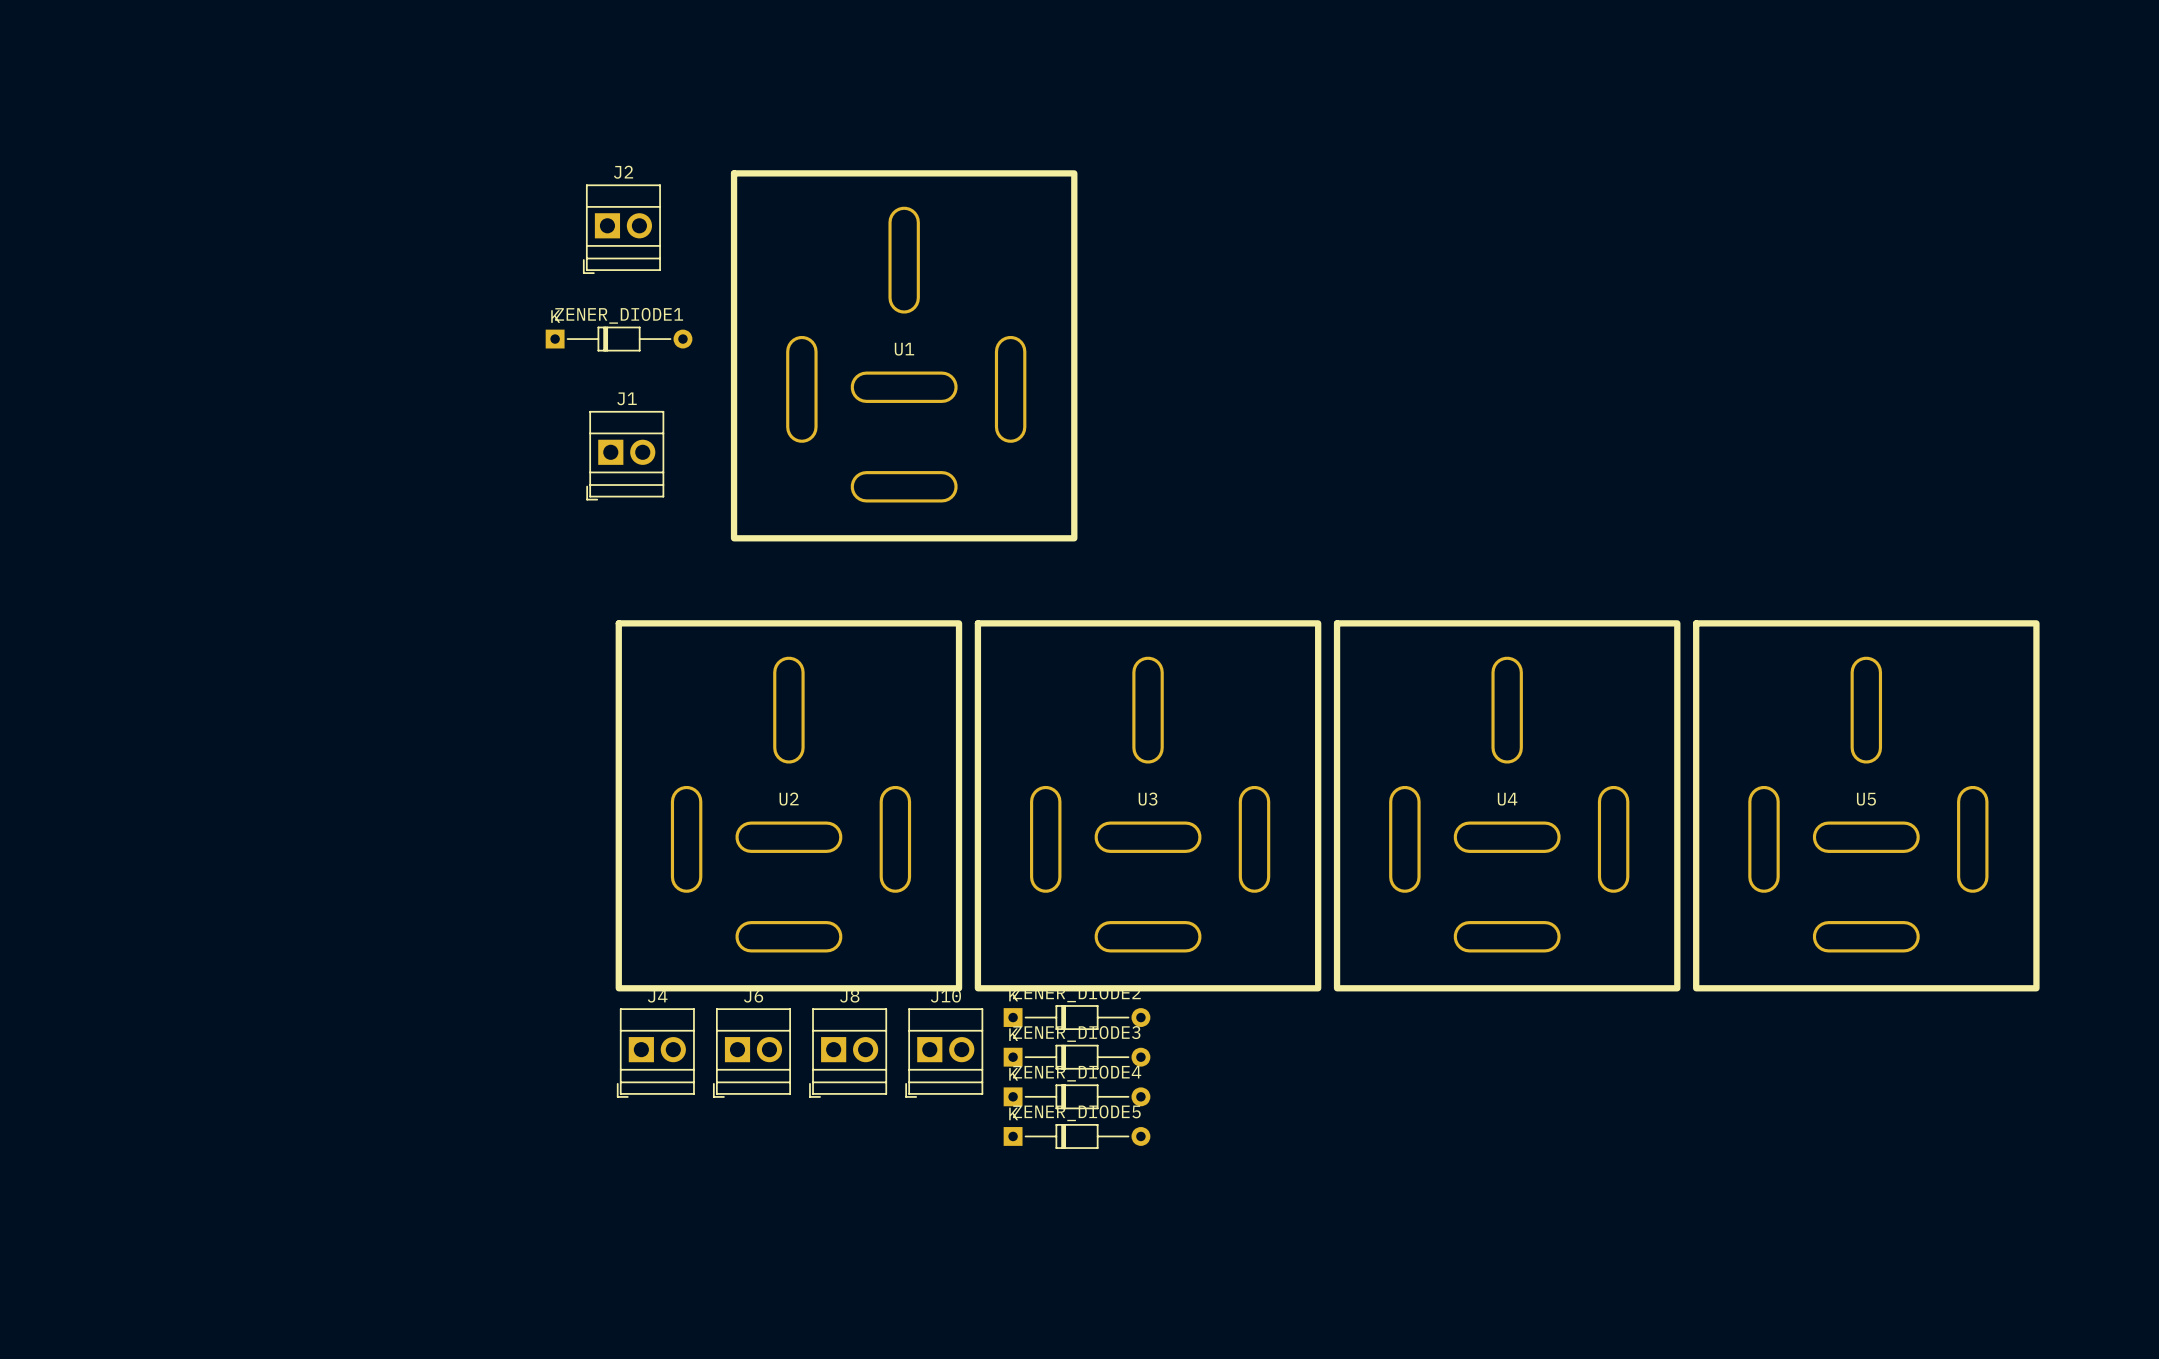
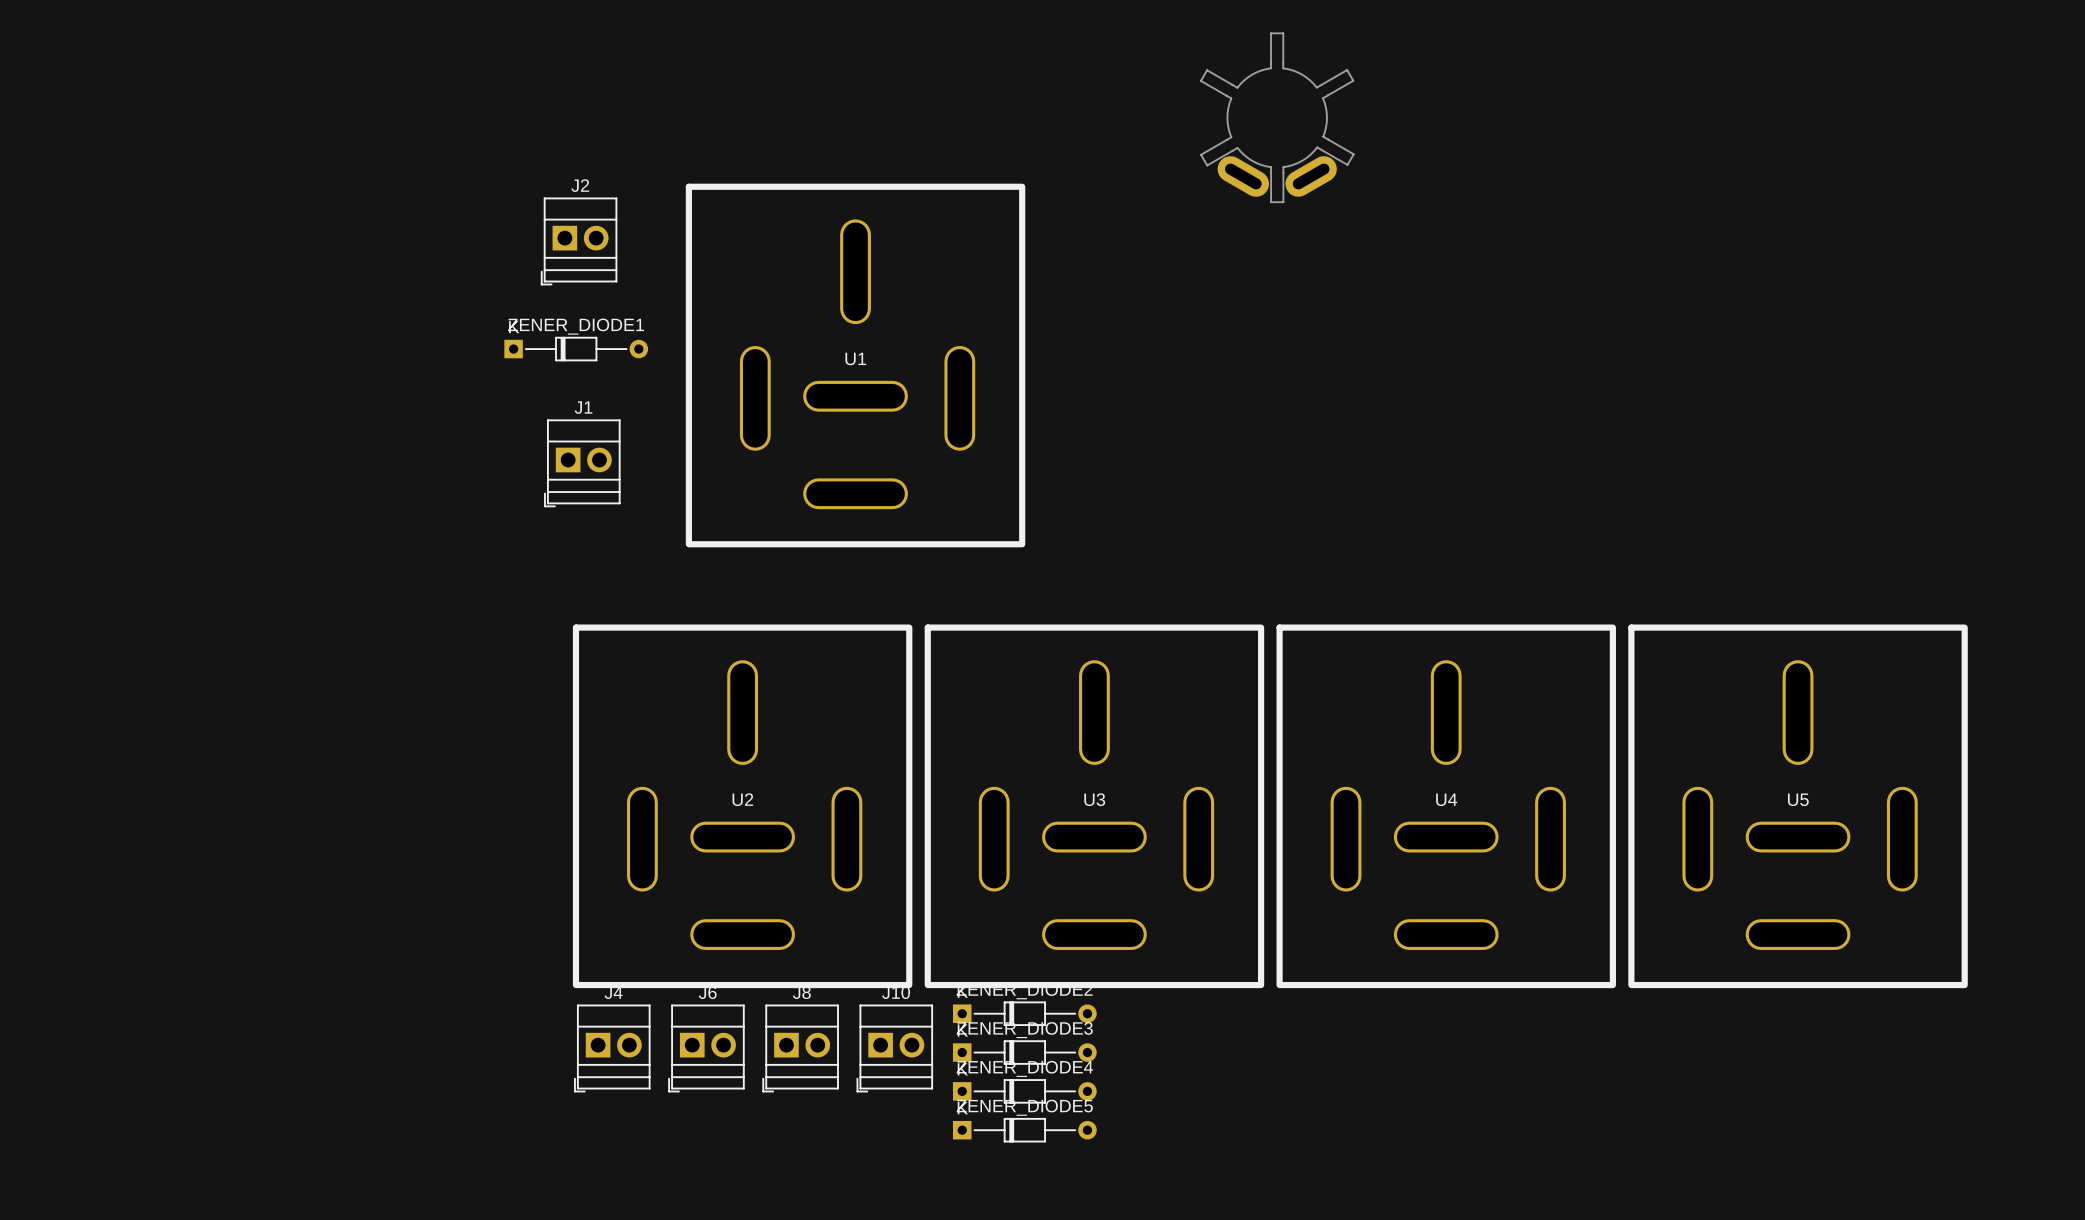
part: none -> (1277, 117)

